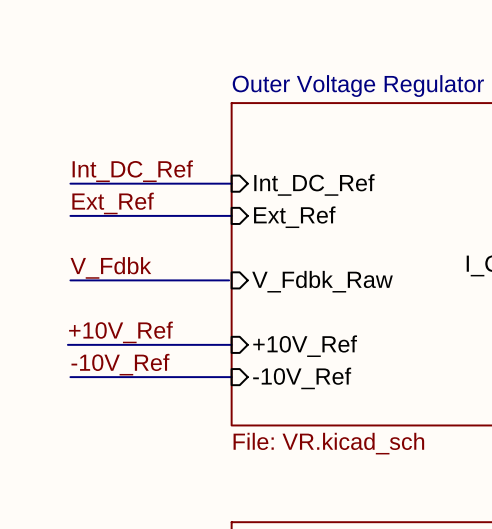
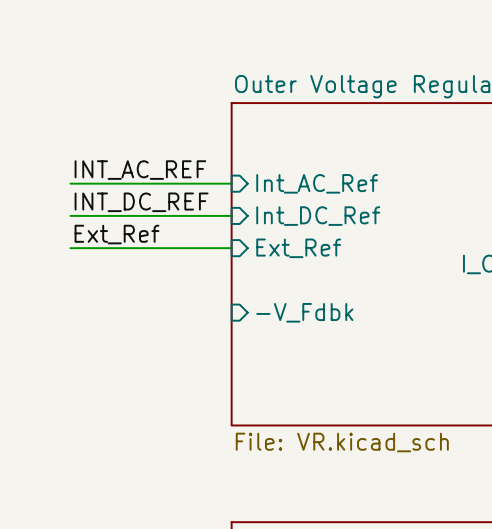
label: Int_DC_Ref (132, 171) -> INT_AC_REF (140, 170)
sheet pin: Int_DC_Ref (314, 184) -> Int_AC_Ref (317, 183)
label: Ext_Ref (113, 203) -> INT_DC_REF (141, 202)
sheet pin: Ext_Ref (294, 217) -> Int_DC_Ref (318, 216)
label: none -> Ext_Ref (117, 234)
sheet pin: none -> Ext_Ref (298, 248)
label: V_Fdbk (110, 267) -> none
wire: (70, 280) (229, 280) -> none
sheet pin: V_Fdbk_Raw (322, 281) -> -V_Fdbk (304, 312)
label: +10V_Ref (120, 332) -> none
wire: (67, 344) (231, 344) -> none
sheet pin: +10V_Ref (305, 346) -> none
label: -10V_Ref (120, 364) -> none
wire: (70, 377) (231, 377) -> (70, 248) (231, 248)
sheet pin: -10V_Ref (302, 378) -> none

